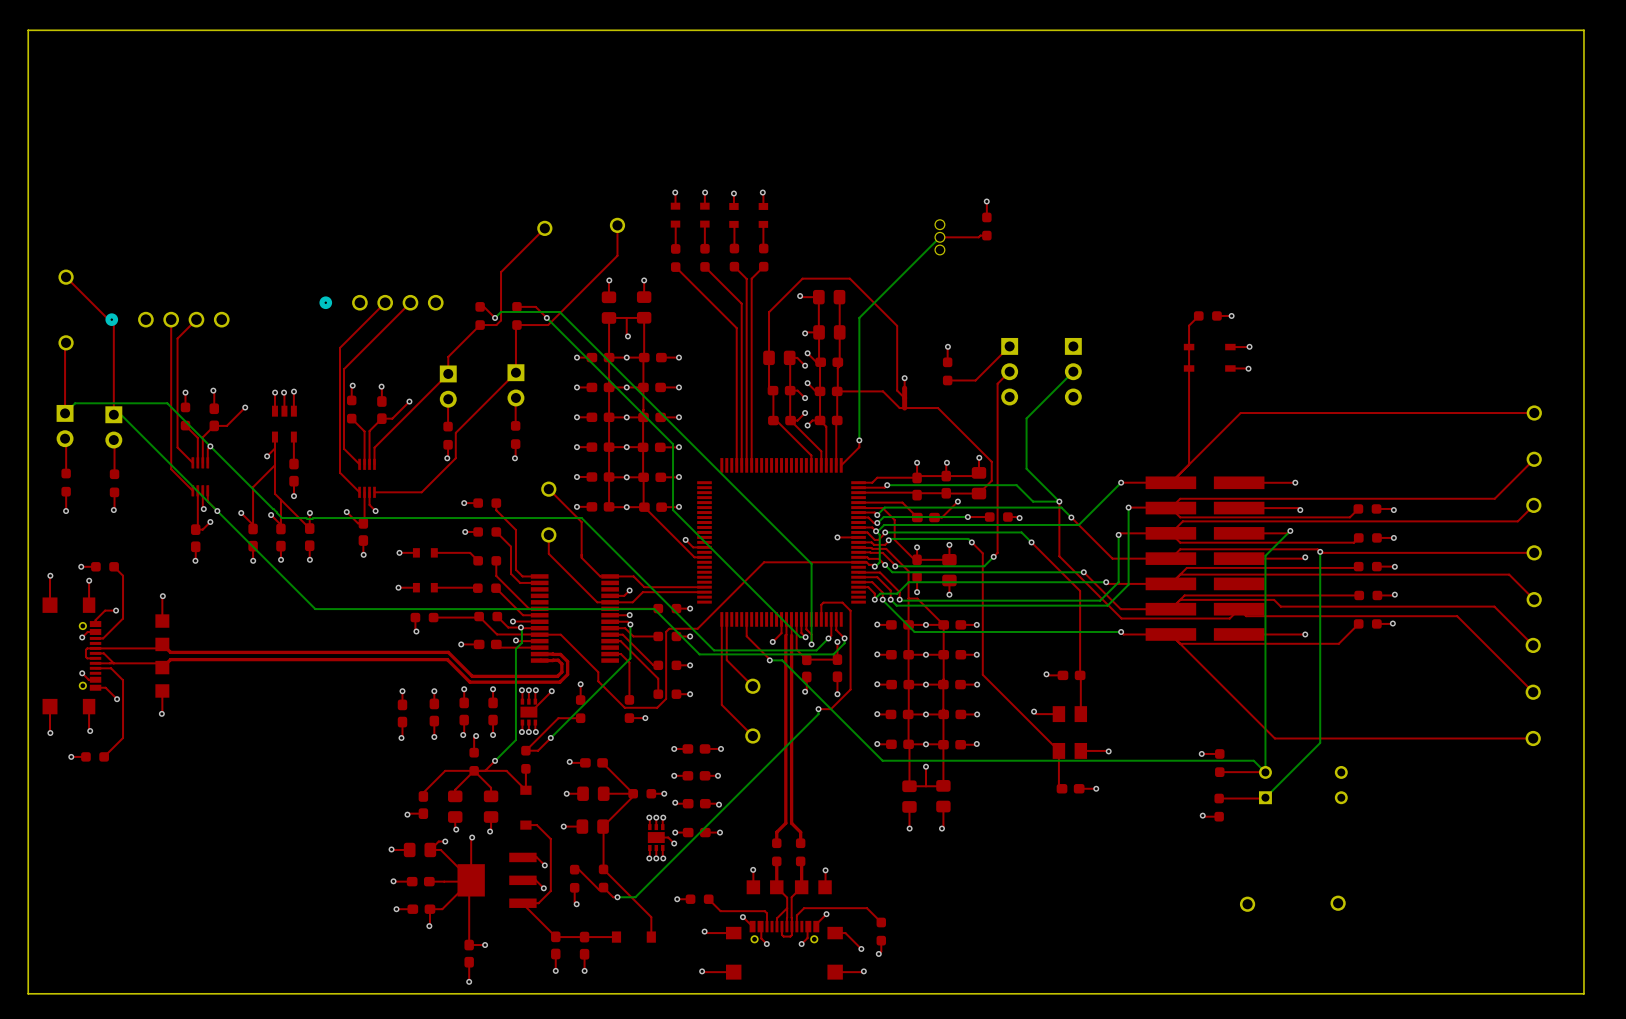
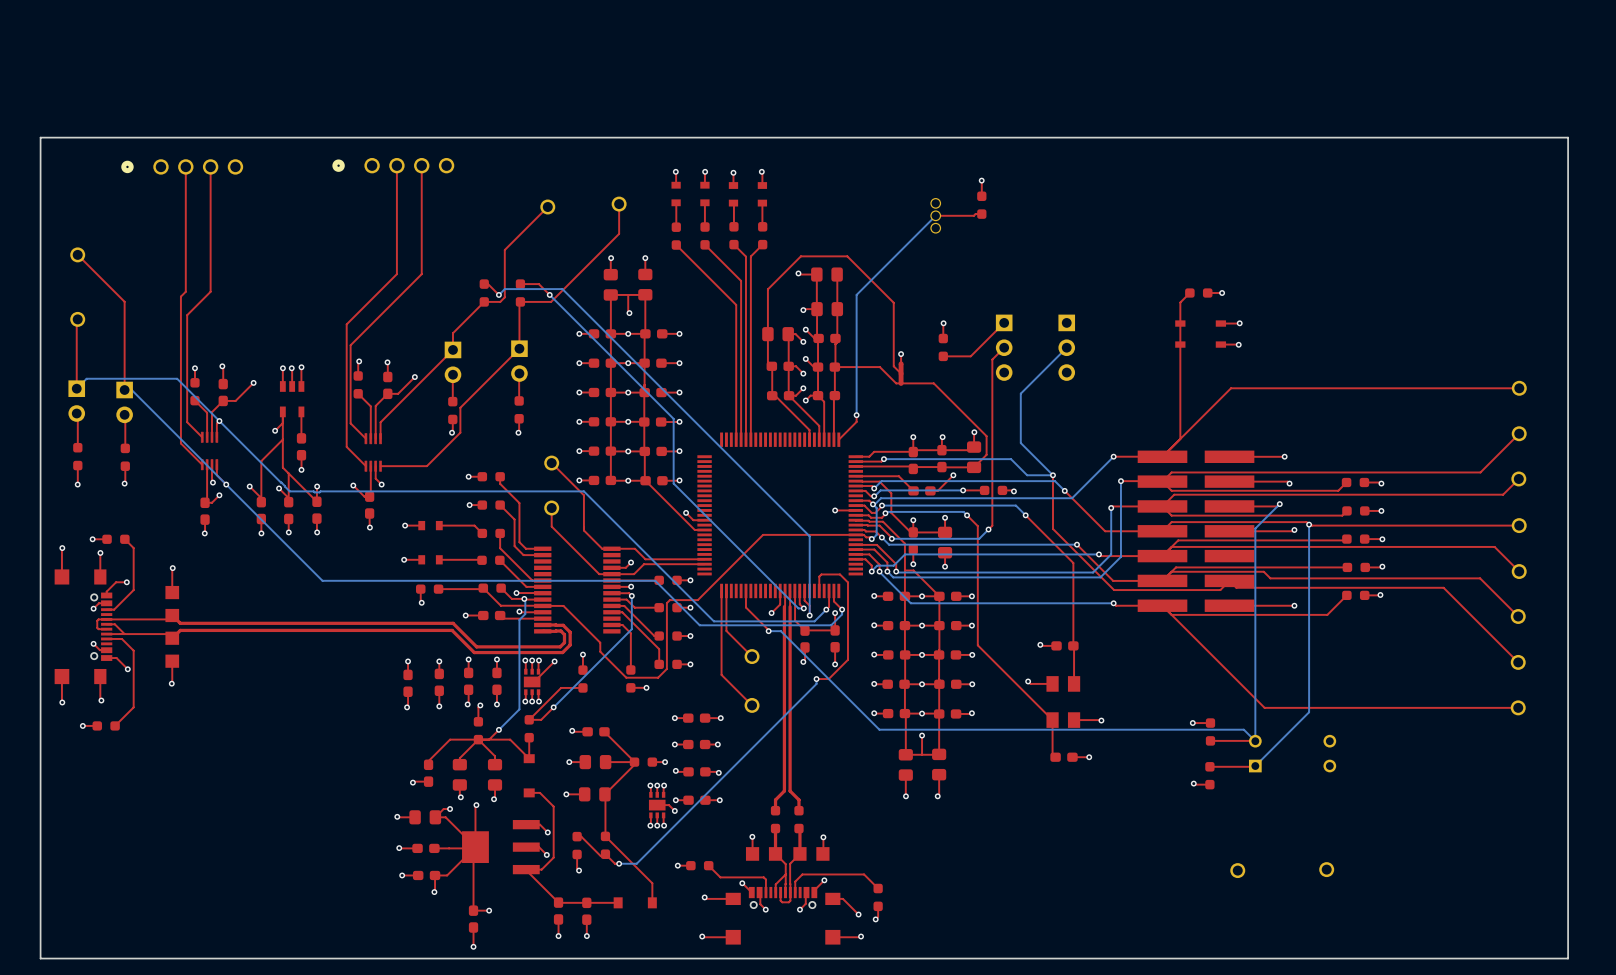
board edge: (1583, 157) (1583, 30) (28, 30) (28, 157) -> (1568, 137) (40, 137)
top track: none -> (396, 165) (396, 274) (391, 280)
top track: none -> (421, 165) (421, 274) (415, 280)
part: none -> (182, 166)
top track: none -> (185, 166) (185, 291) (180, 296)
top track: none -> (210, 166) (210, 291) (205, 296)
part position: (381, 302) -> (393, 165)
part: (167, 319) -> none

